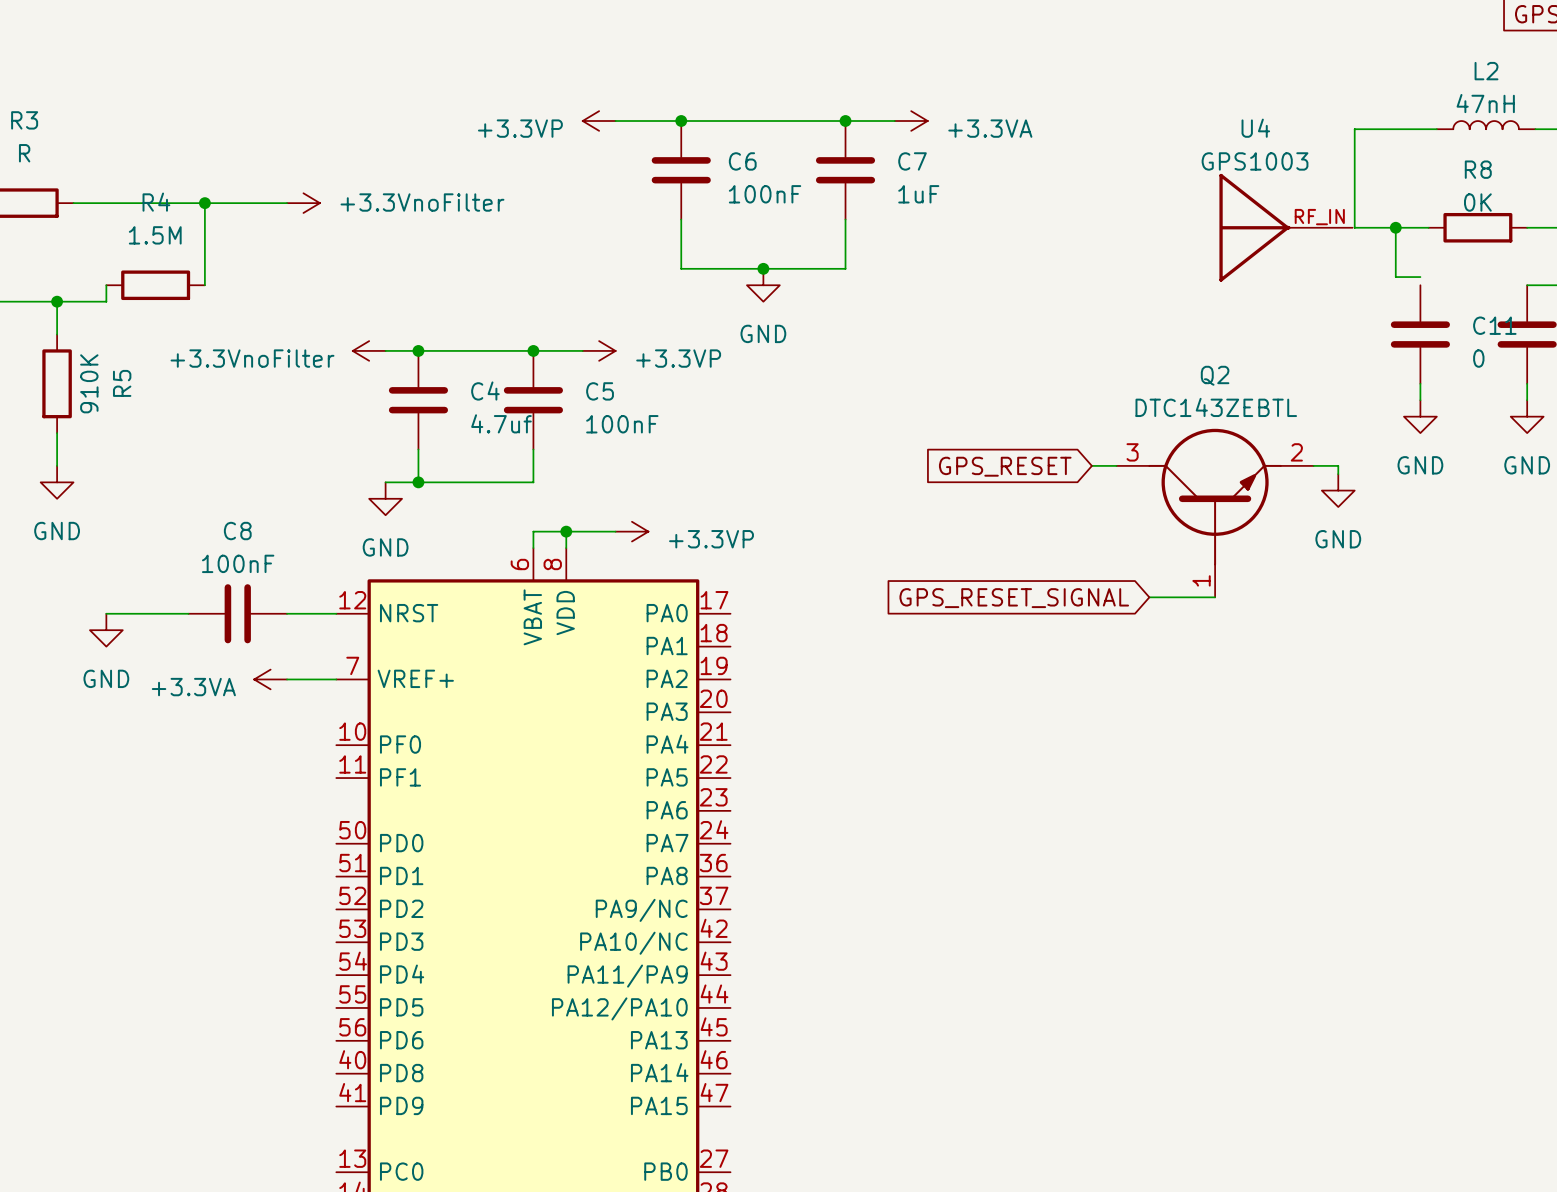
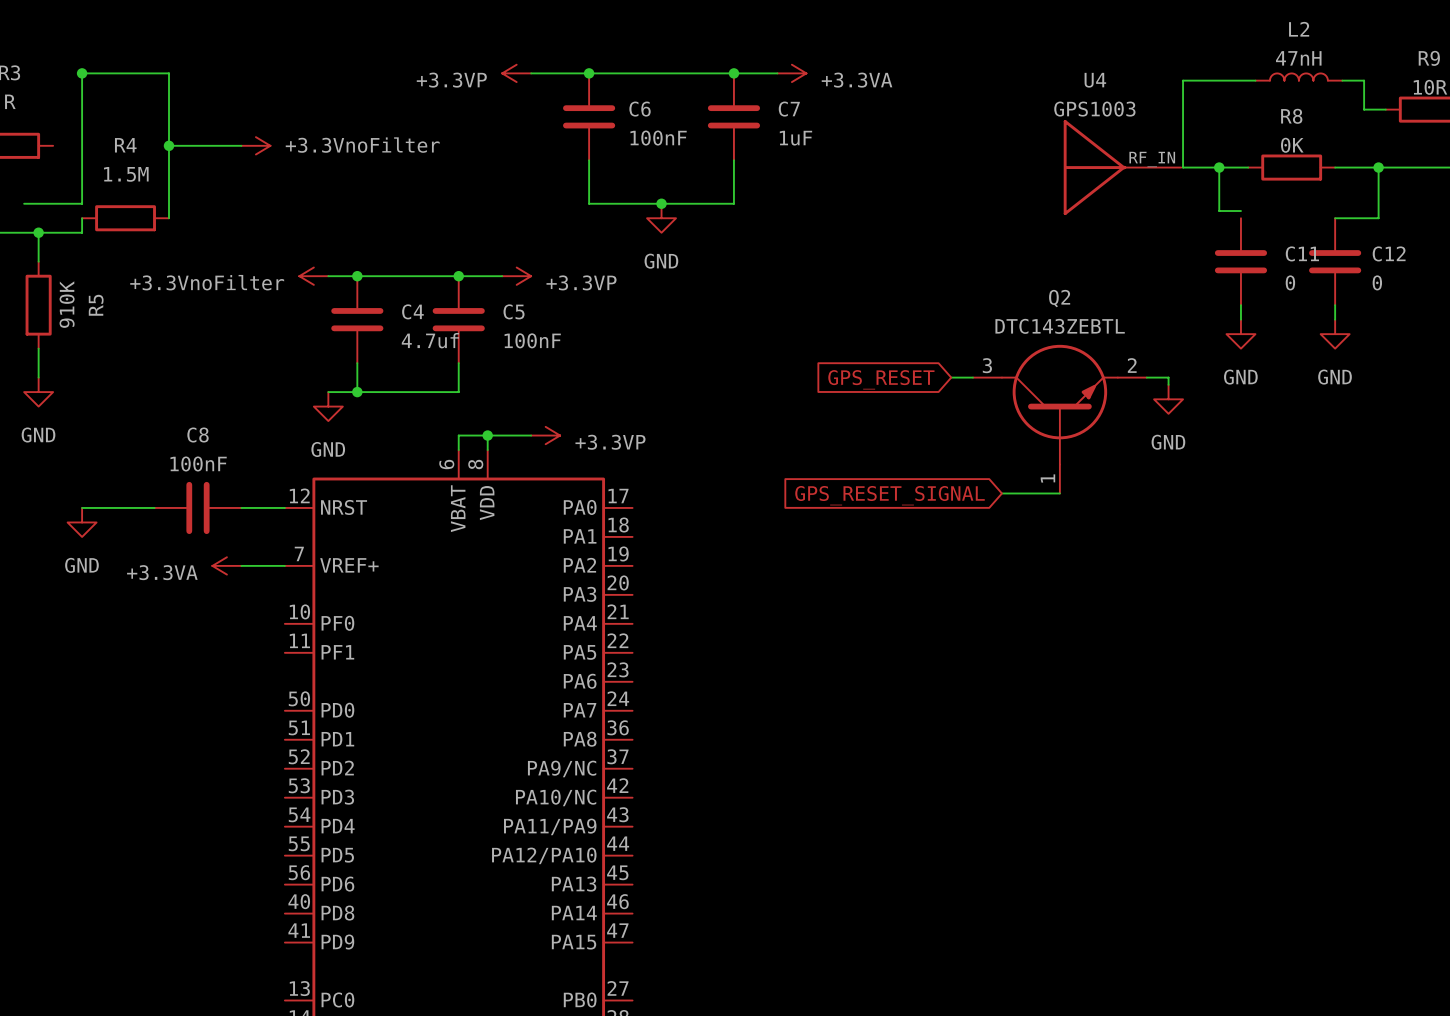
junction: none -> (82, 73)
wire: (73, 203) (204, 203) -> (24, 203) (82, 203) (82, 73) (169, 73) (169, 145)

